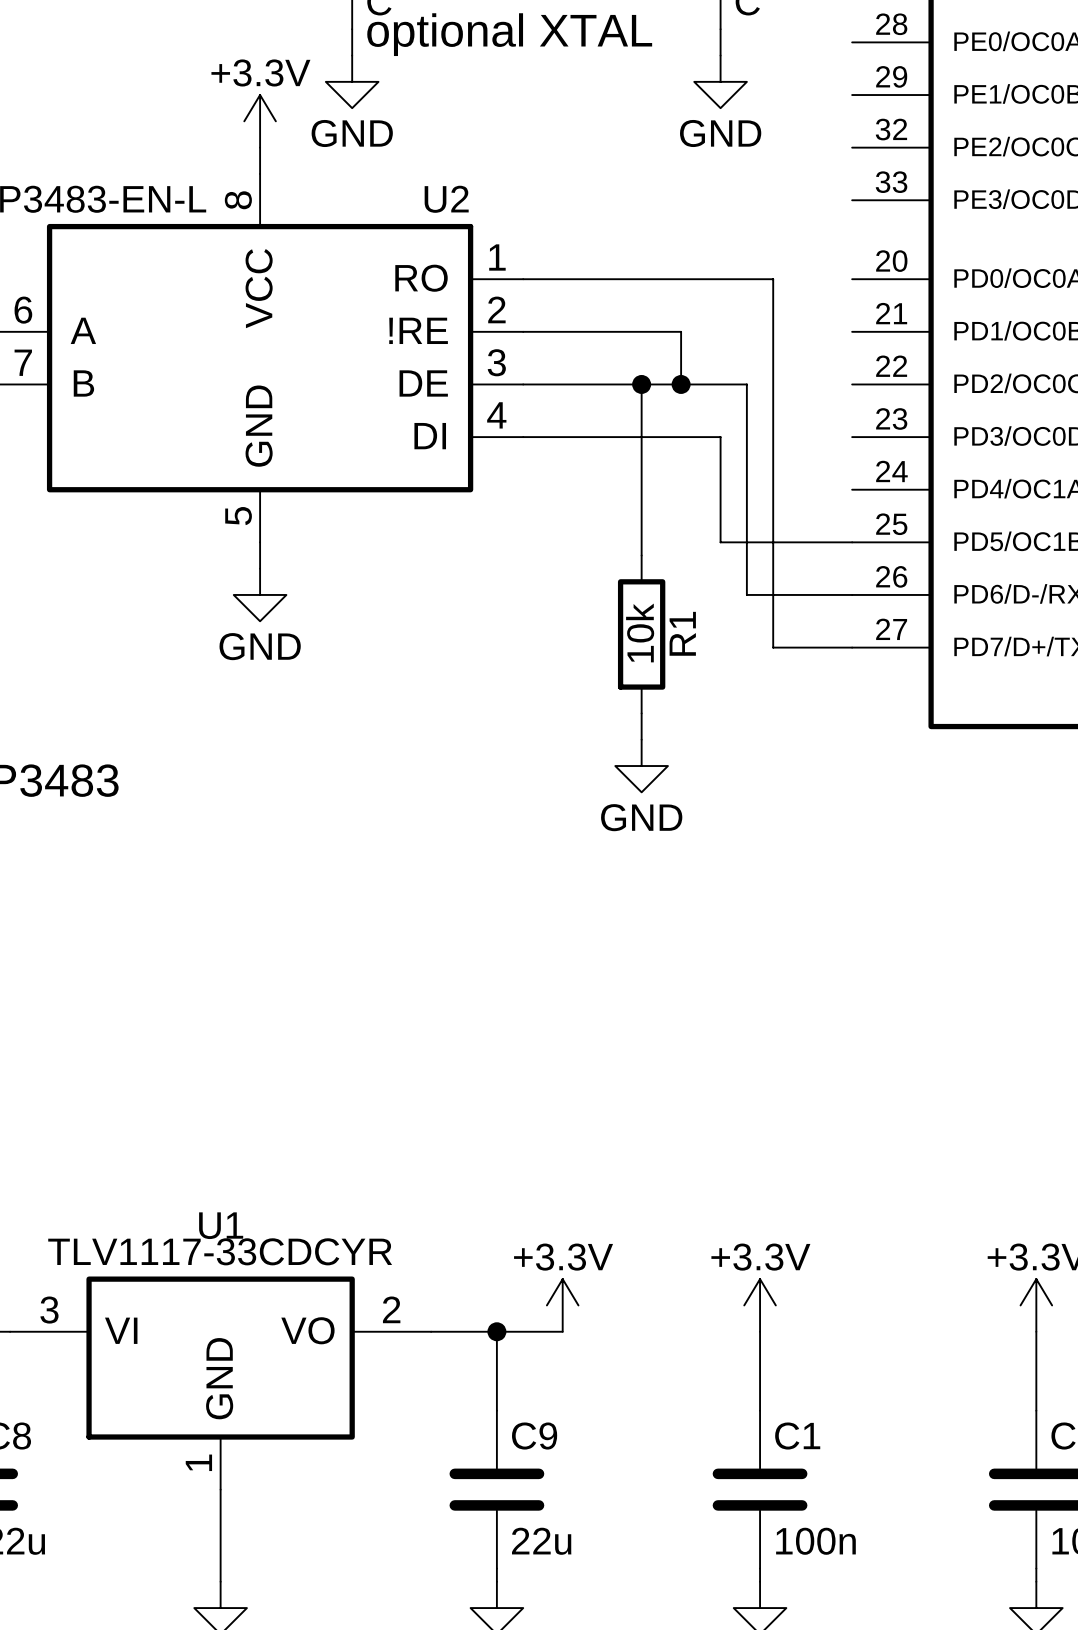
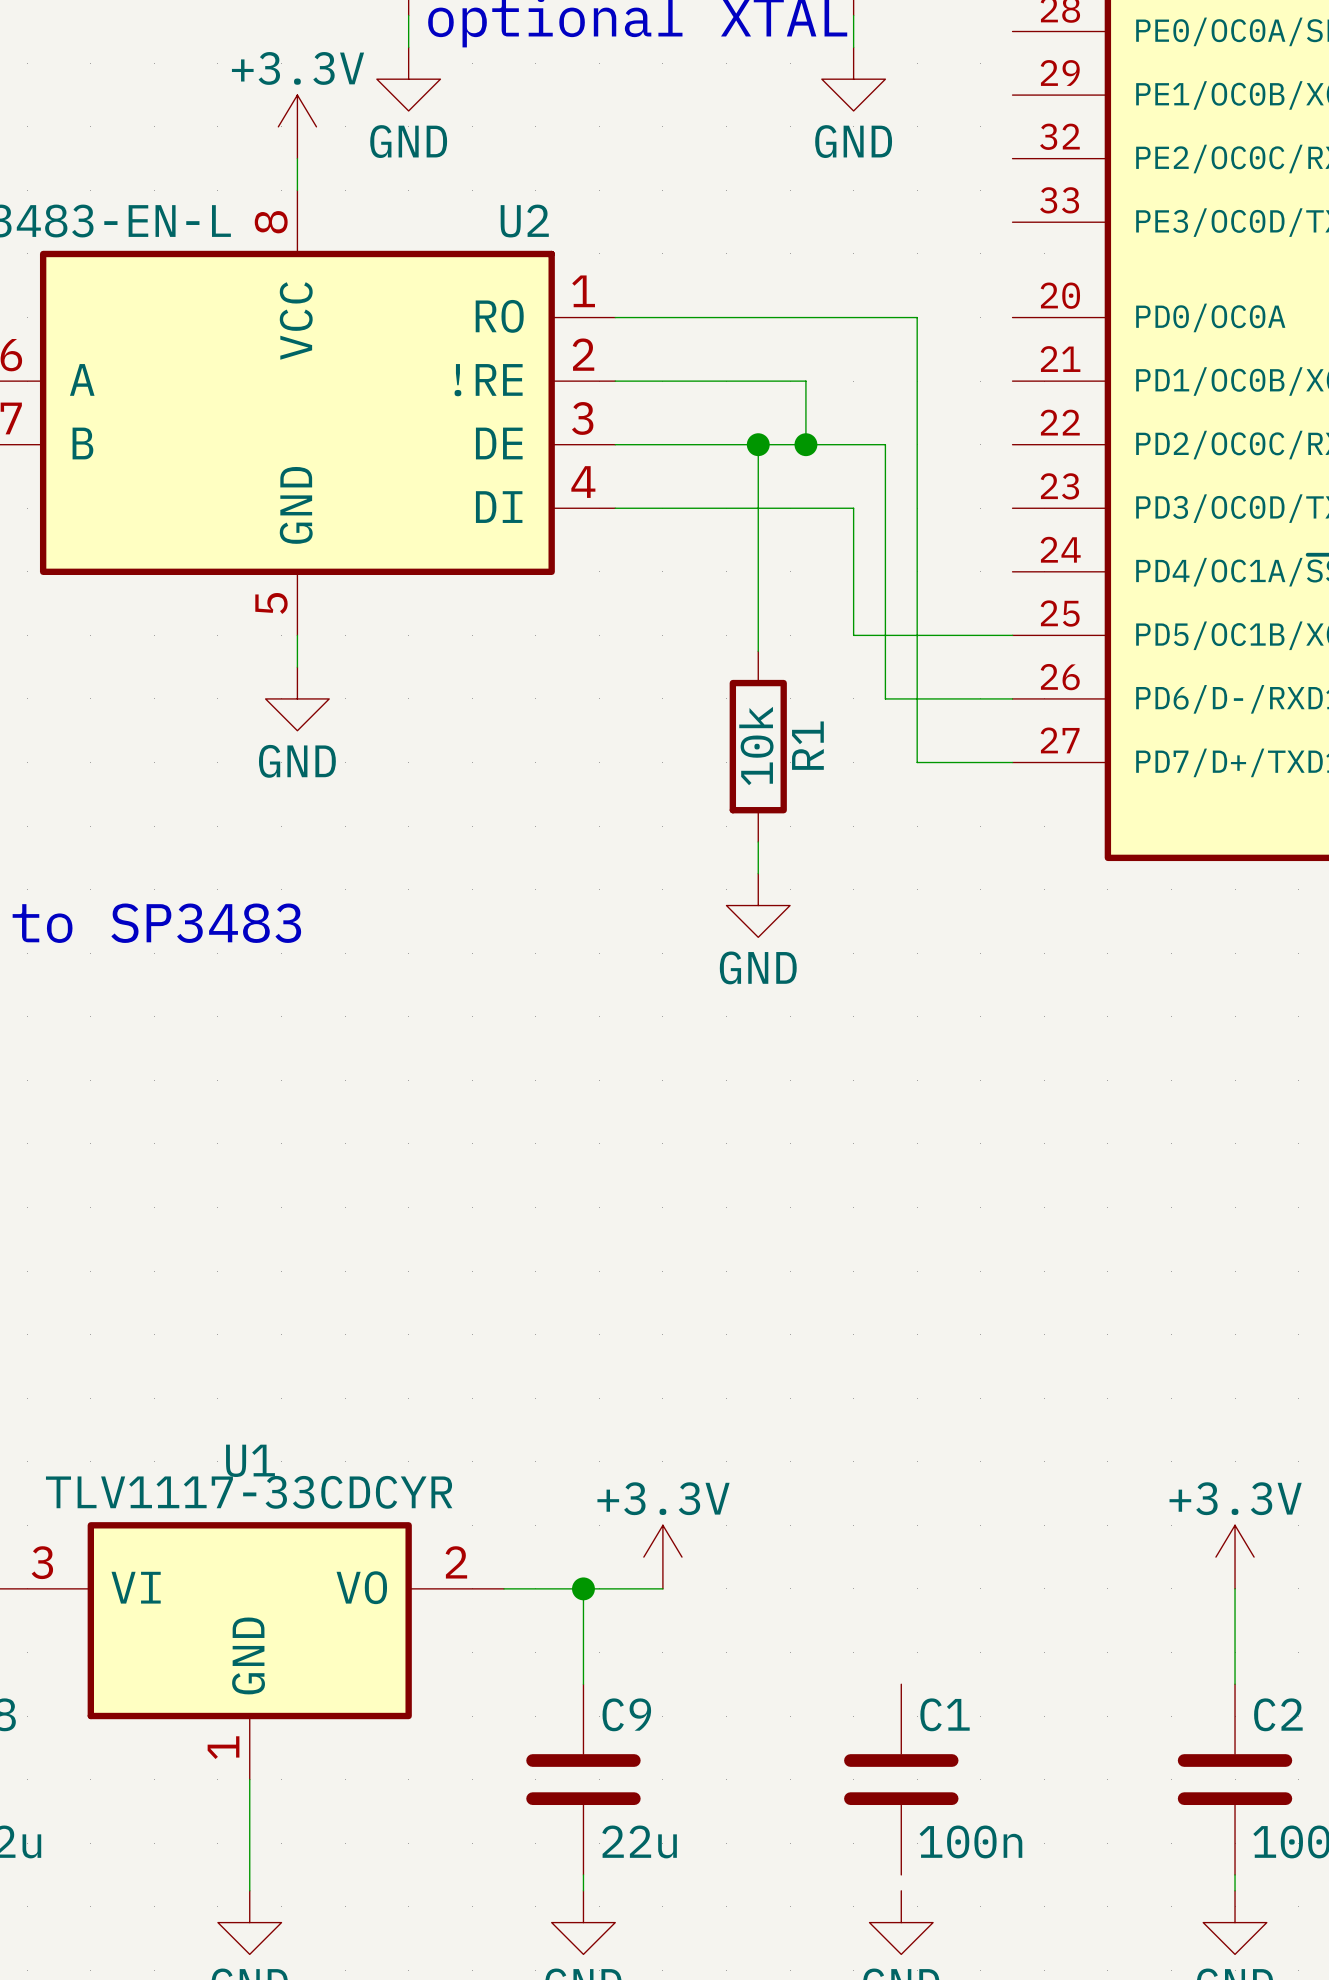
power symbol: +3.3V (760, 1305) -> none
wire: (760, 1331) (760, 1410) -> none
wire: (760, 1568) (760, 1581) -> none

